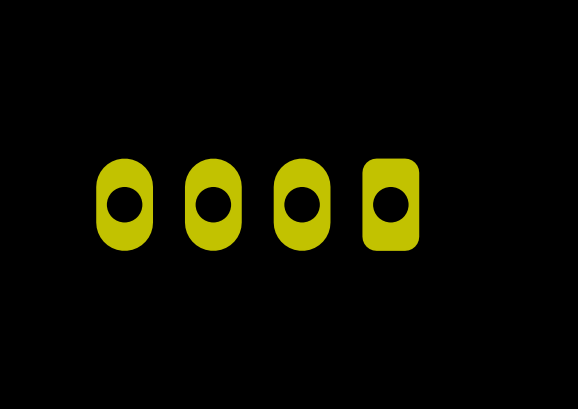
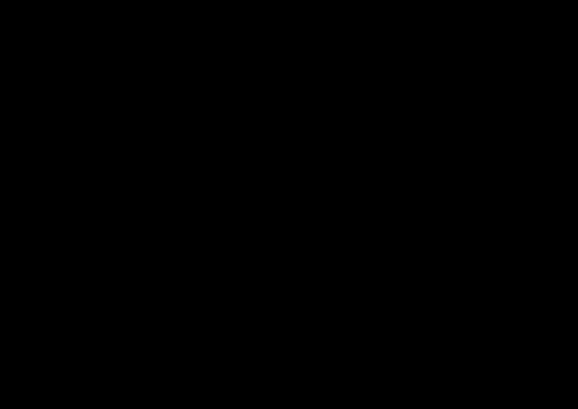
part: (257, 204) -> none

